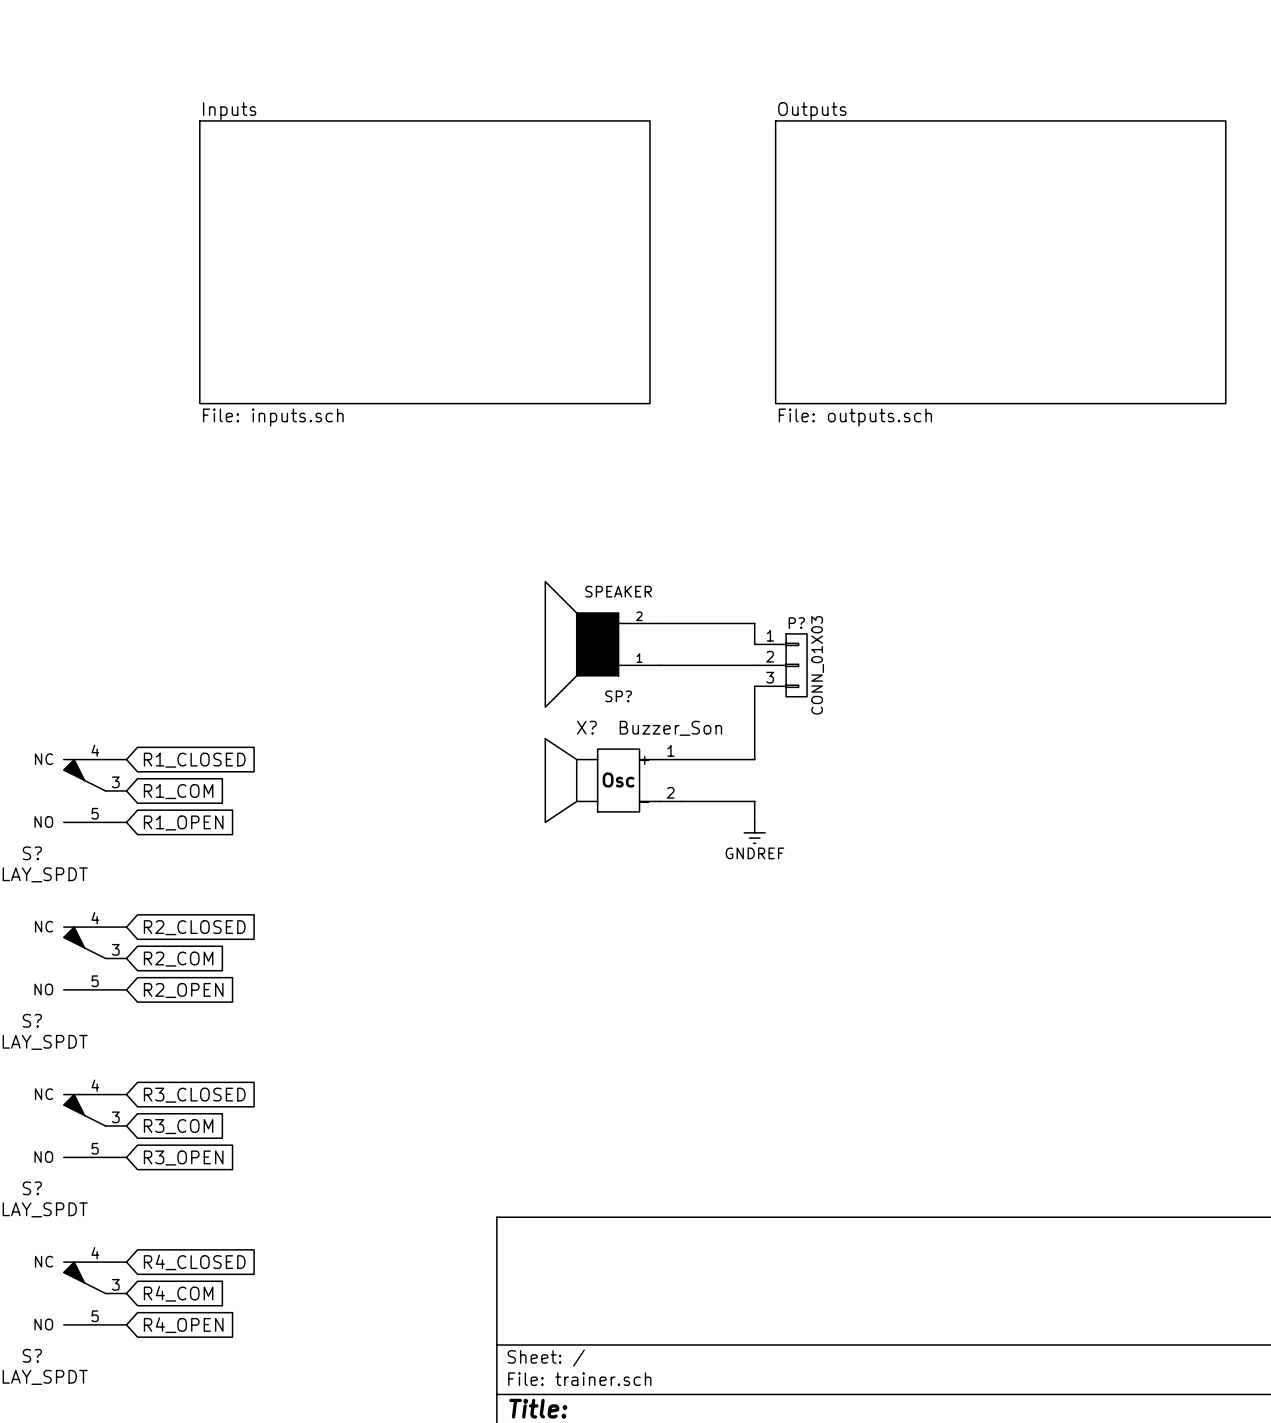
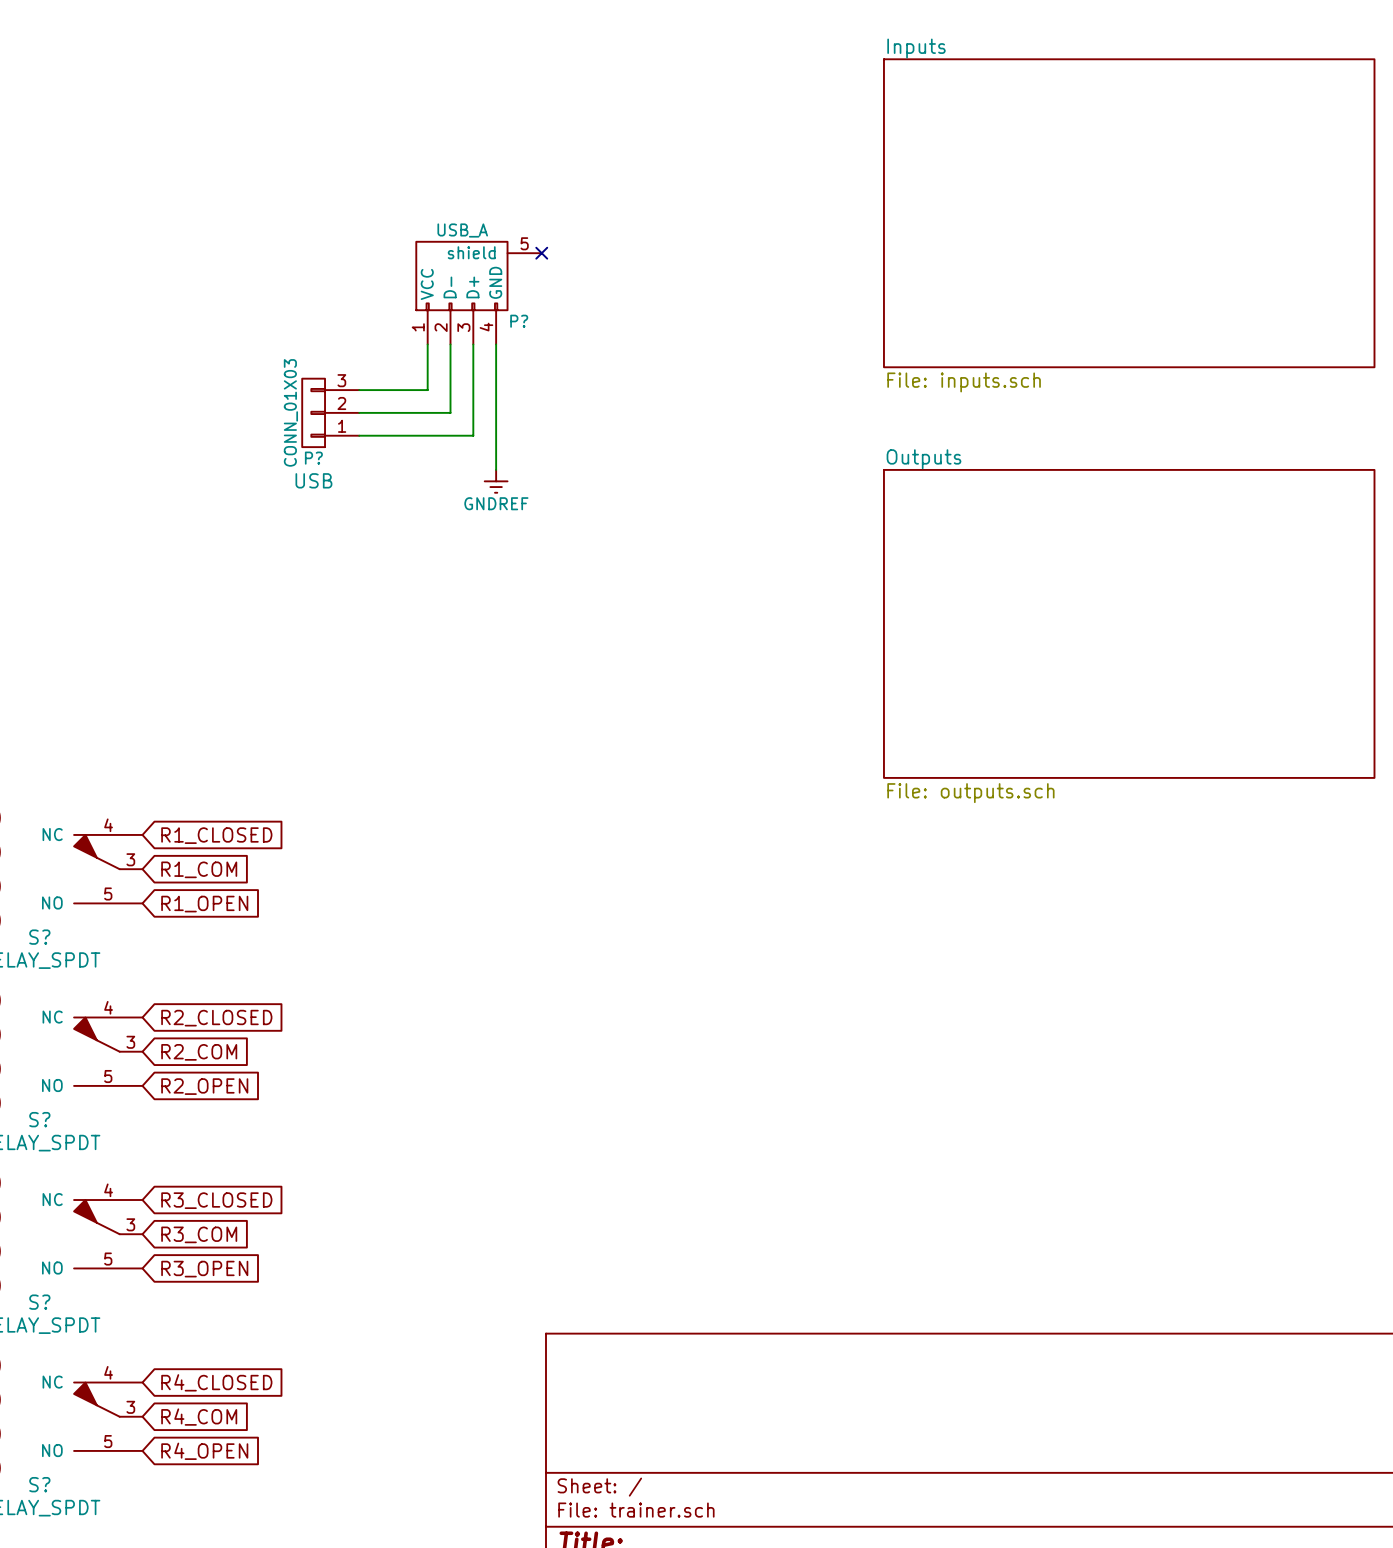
sheet Inputs: none -> File: inputs.sch (1129, 213)
no-connect mark: none -> (541, 253)
sheet Inputs: File: inputs.sch (424, 262) -> none
P?: none -> USB_A (479, 293)
sheet Outputs: File: outputs.sch (1000, 262) -> none
wire: none -> (427, 344) (427, 390) (359, 390)
wire: none -> (450, 344) (450, 412) (359, 412)
wire: none -> (473, 344) (473, 435) (359, 435)
wire: none -> (496, 344) (496, 469)
P?: none -> CONN_01X03 (330, 412)
power symbol: none -> GNDREF (496, 481)
sheet Outputs: none -> File: outputs.sch (1129, 623)
wire: (660, 623) (754, 623) (754, 644) -> none
SP?: SPEAKER (602, 644) -> none
wire: (660, 665) (754, 665) -> none
P?: CONN_01X03 (780, 665) -> none
wire: (754, 686) (754, 759) (681, 759) -> none
X?: Buzzer_Son (613, 780) -> none
wire: (681, 801) (754, 801) (754, 822) -> none
power symbol: GNDREF (754, 832) -> none

